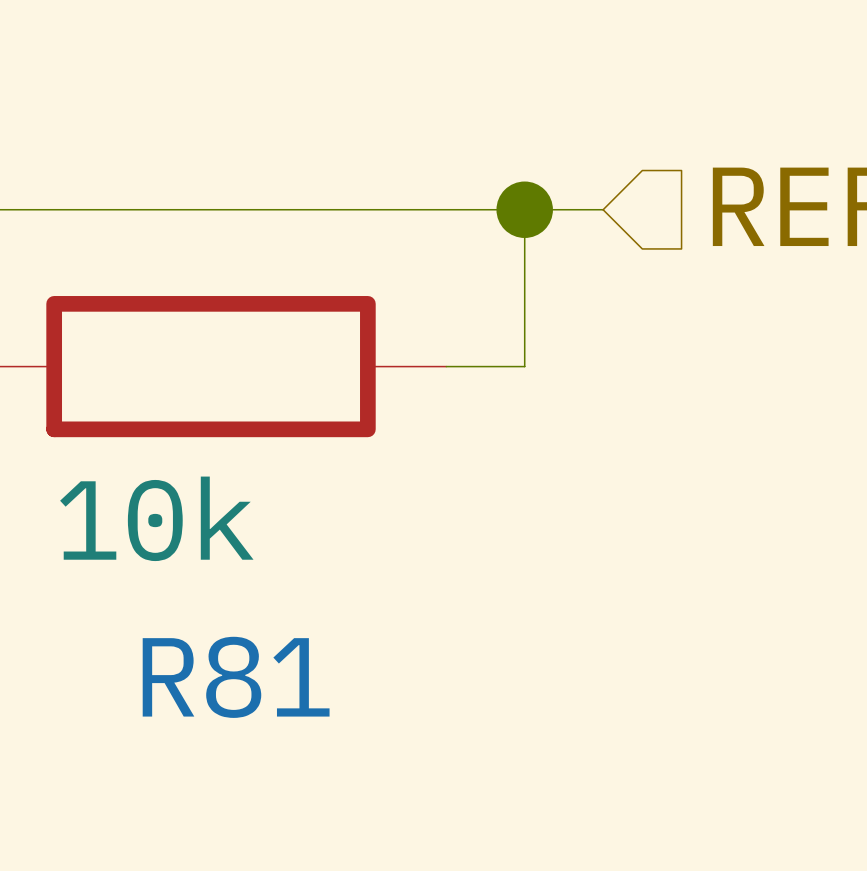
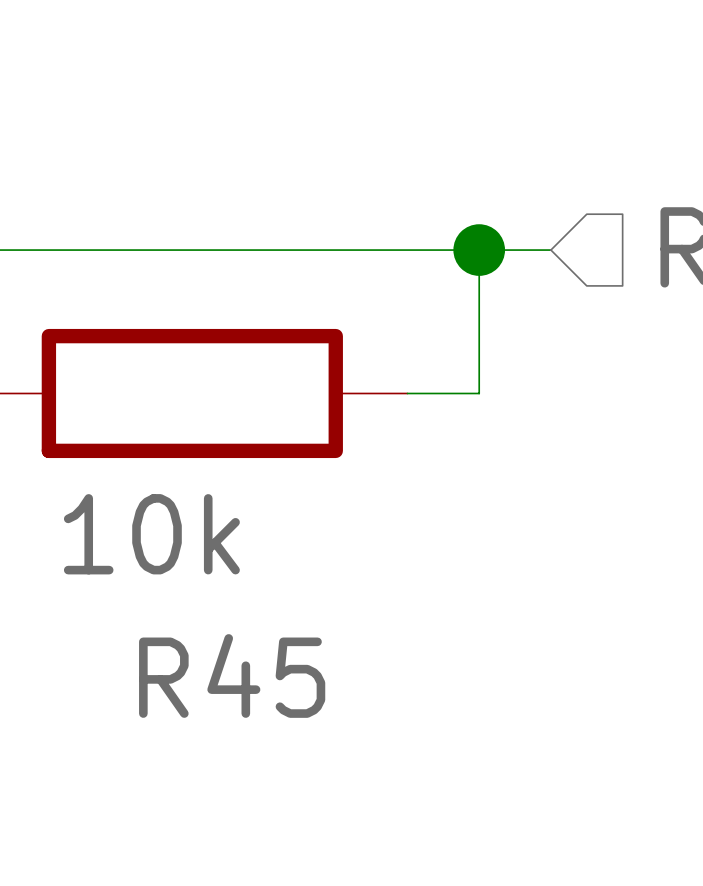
R81 name: R81 (236, 677) -> R45 (232, 675)

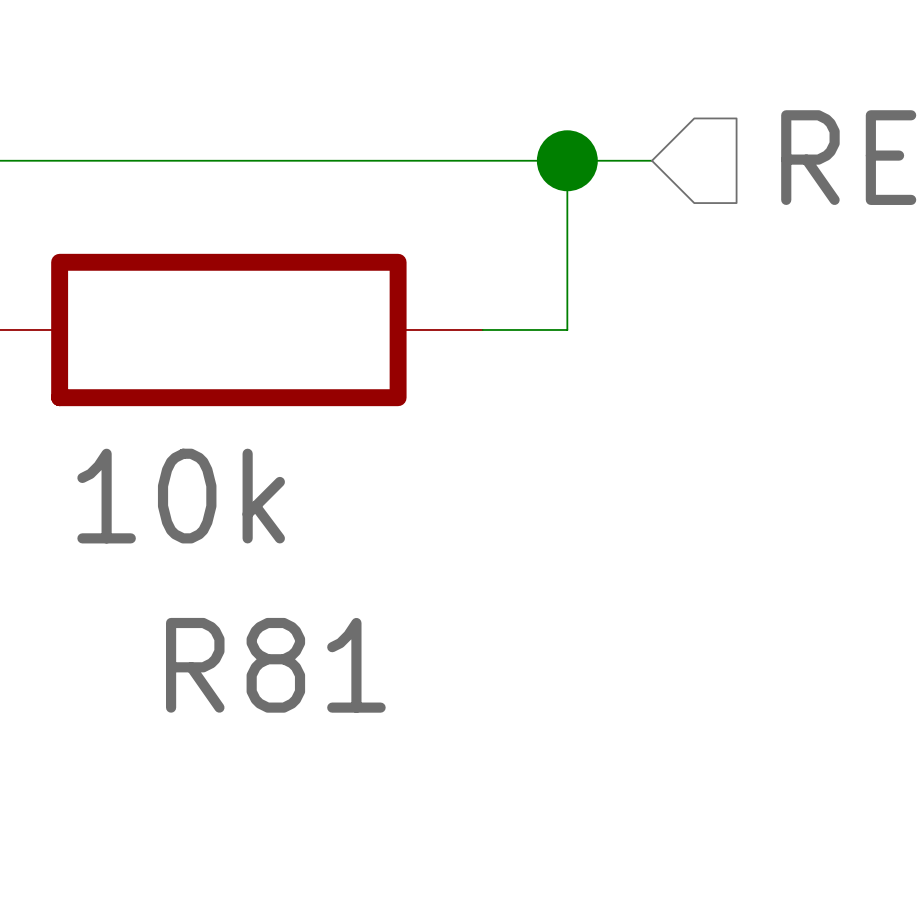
R45 name: R45 (232, 675) -> R81 (275, 665)

